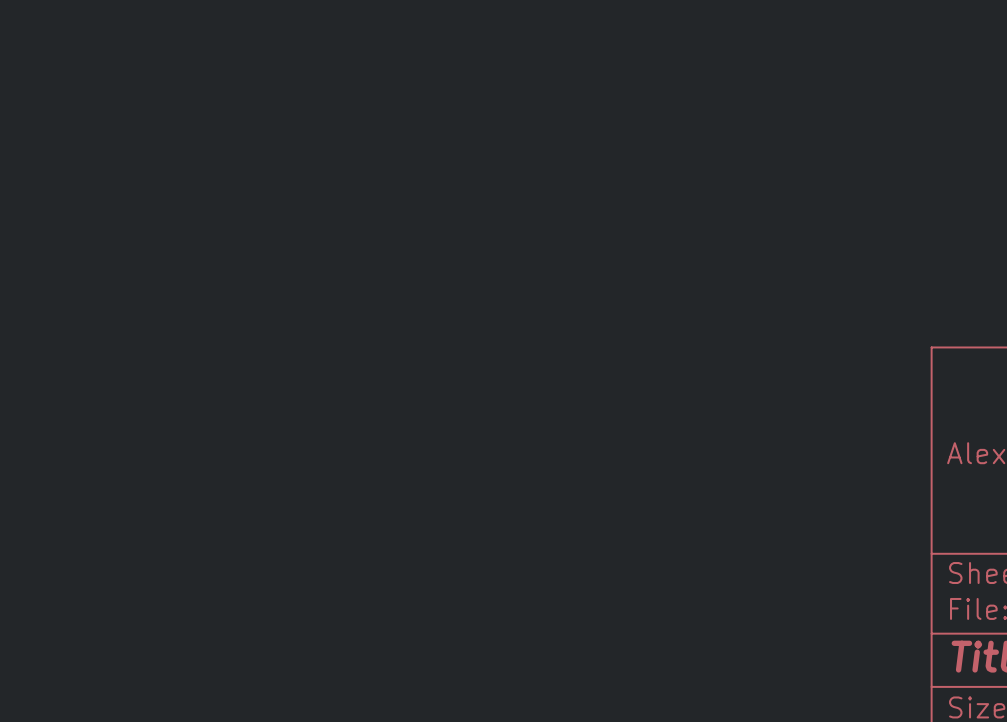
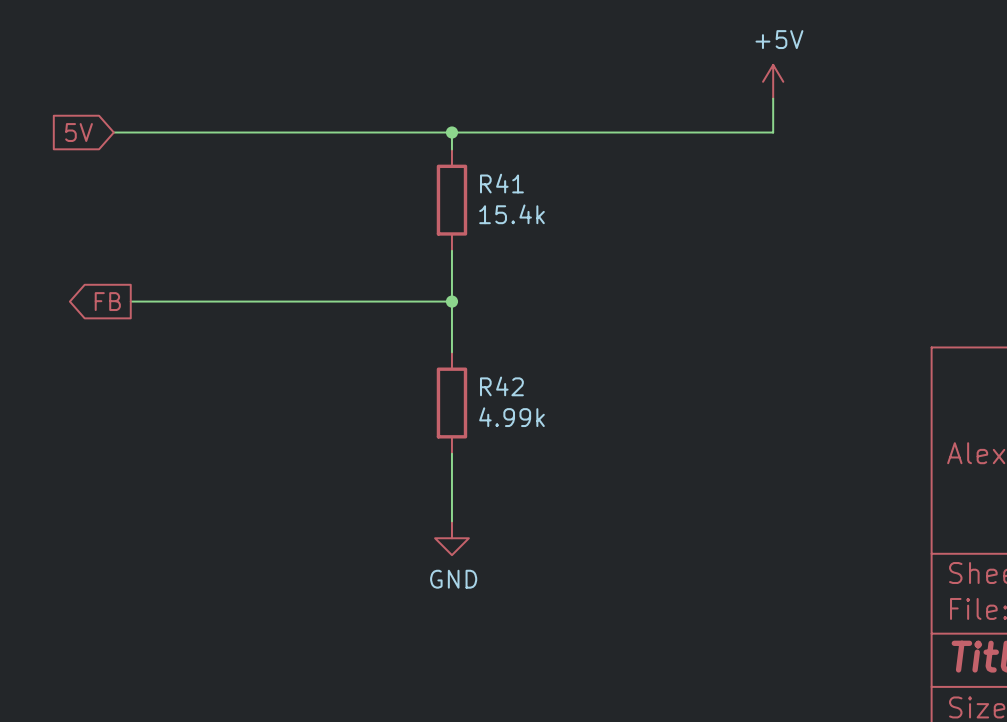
power symbol: none -> +5V (773, 81)
wire: none -> (773, 98) (773, 132) (113, 132)
global label: none -> 5V (79, 132)
wire: none -> (451, 132) (451, 149)
junction: none -> (451, 132)
R41: none -> 15.4k (451, 200)
wire: none -> (451, 250) (451, 352)
global label: none -> FB (107, 301)
wire: none -> (130, 301) (451, 301)
junction: none -> (451, 301)
R42: none -> 4.99k (451, 403)
wire: none -> (451, 453) (451, 521)
power symbol: none -> GND (451, 538)

